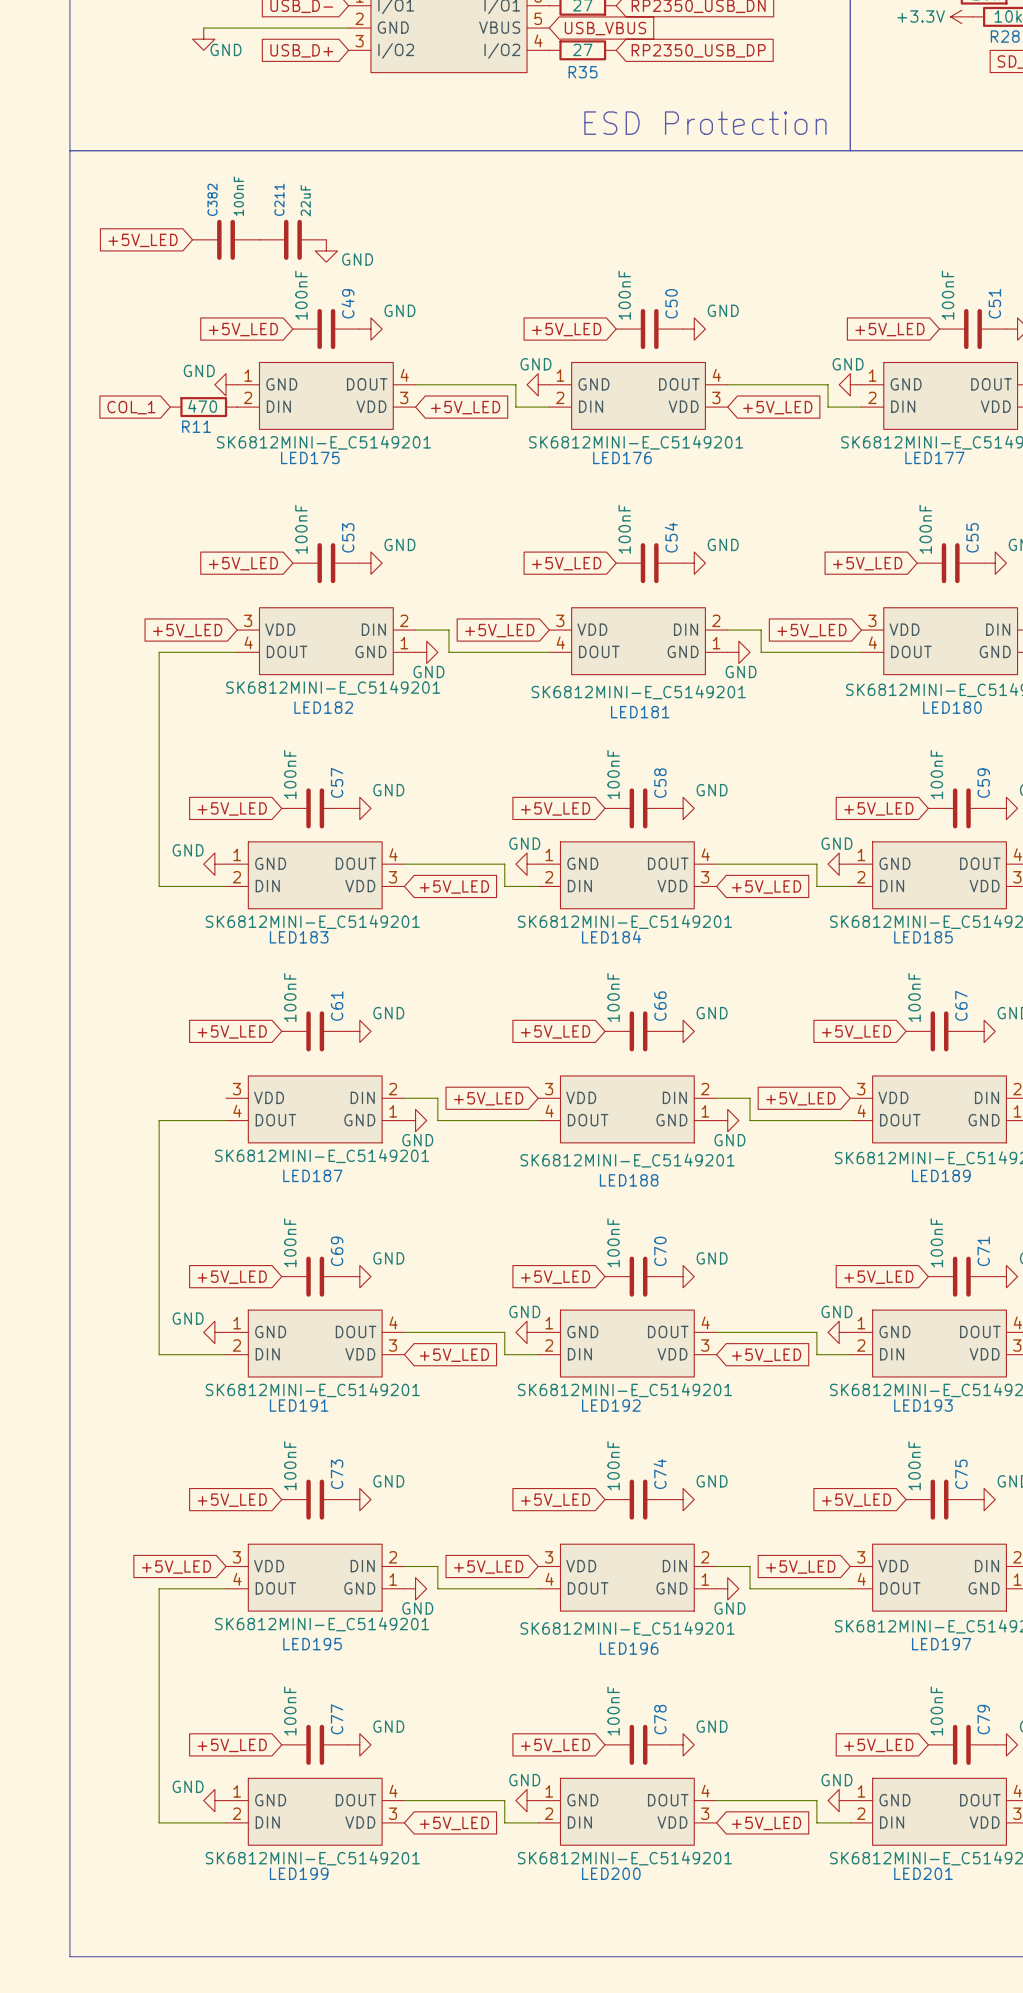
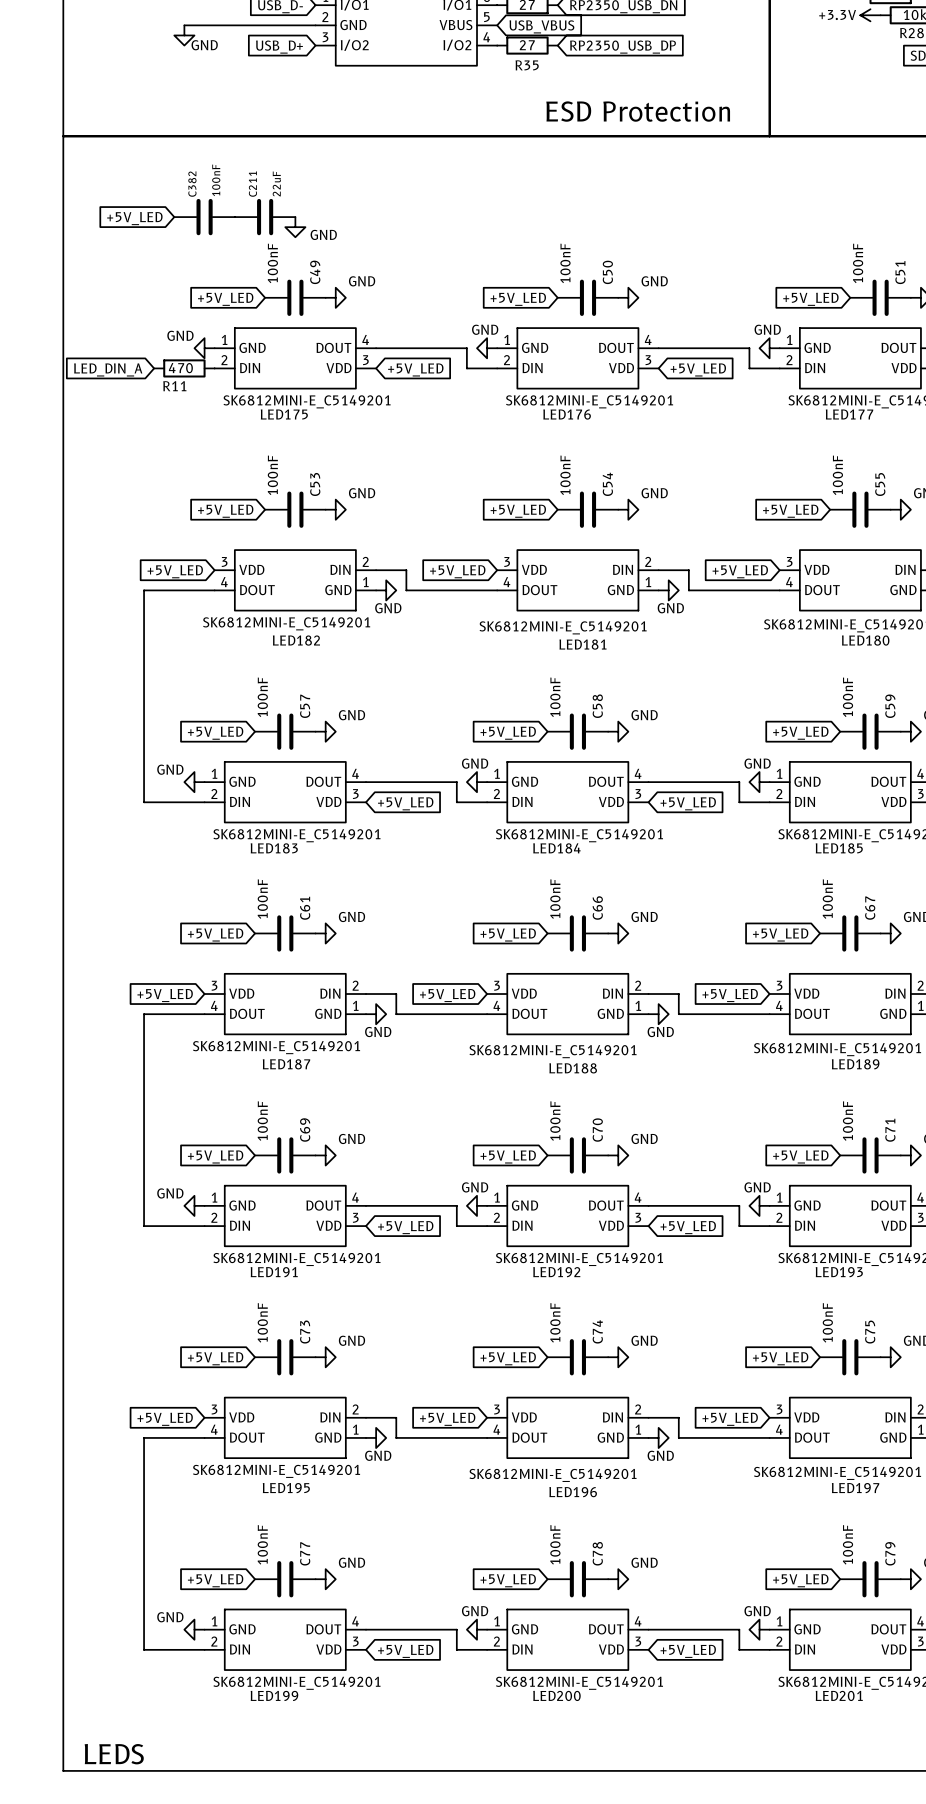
global label: COL_1 (131, 407) -> LED_DIN_A (108, 369)
global label: none -> +5V_LED (165, 995)
text: none -> LEDS (114, 1754)

